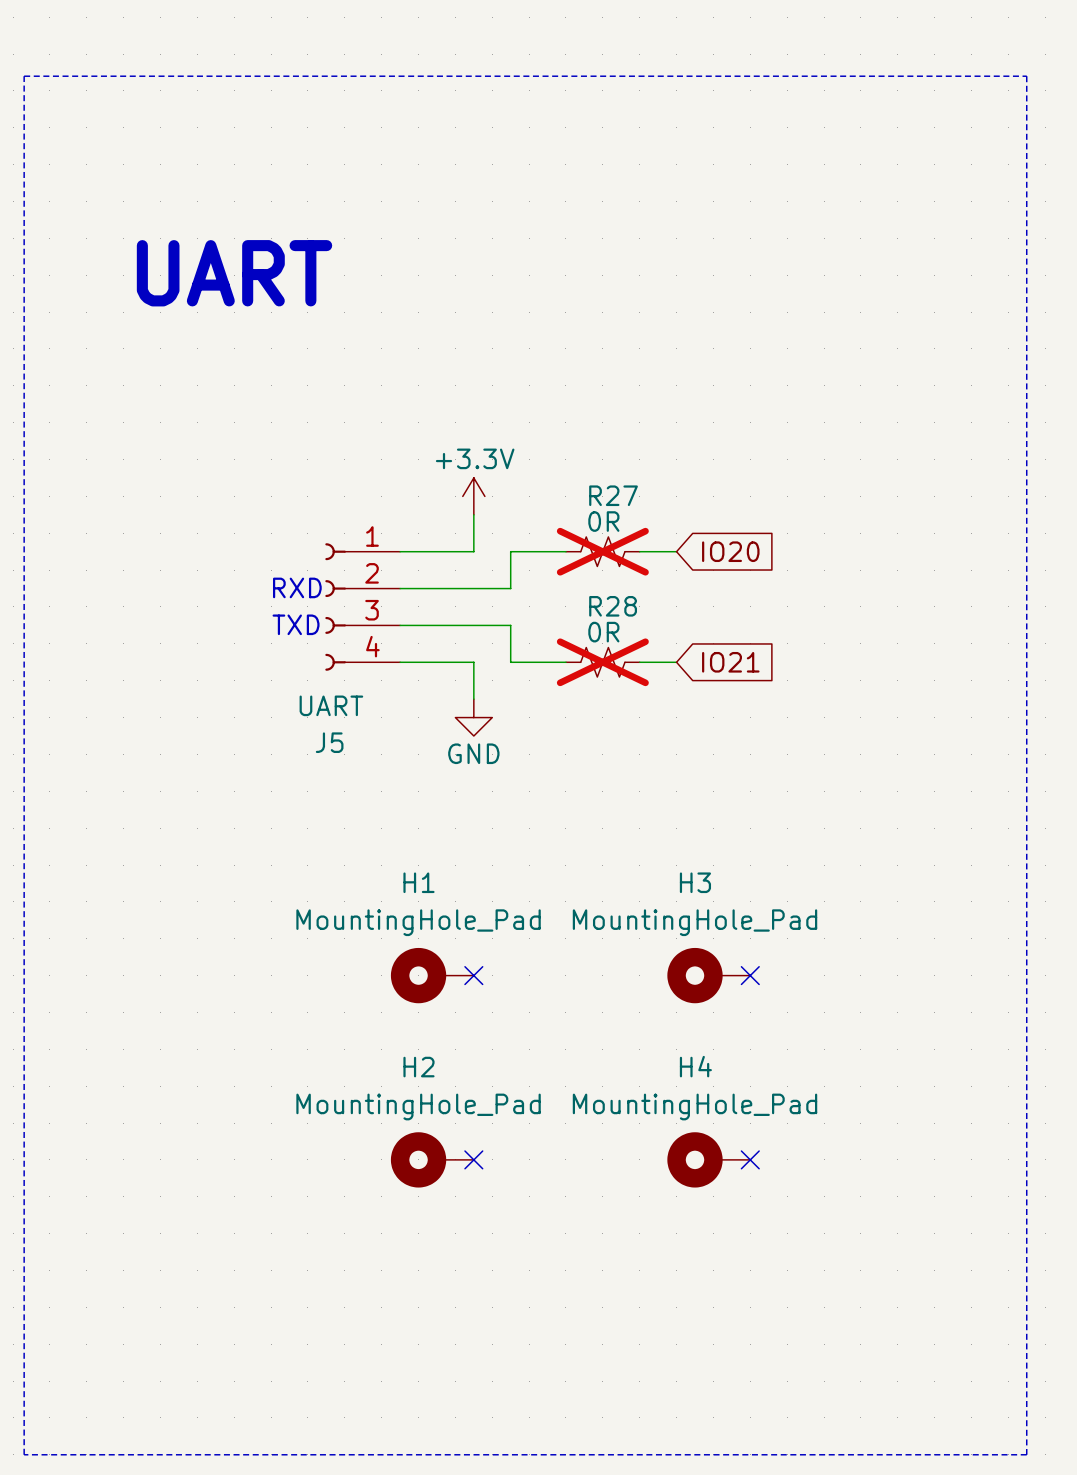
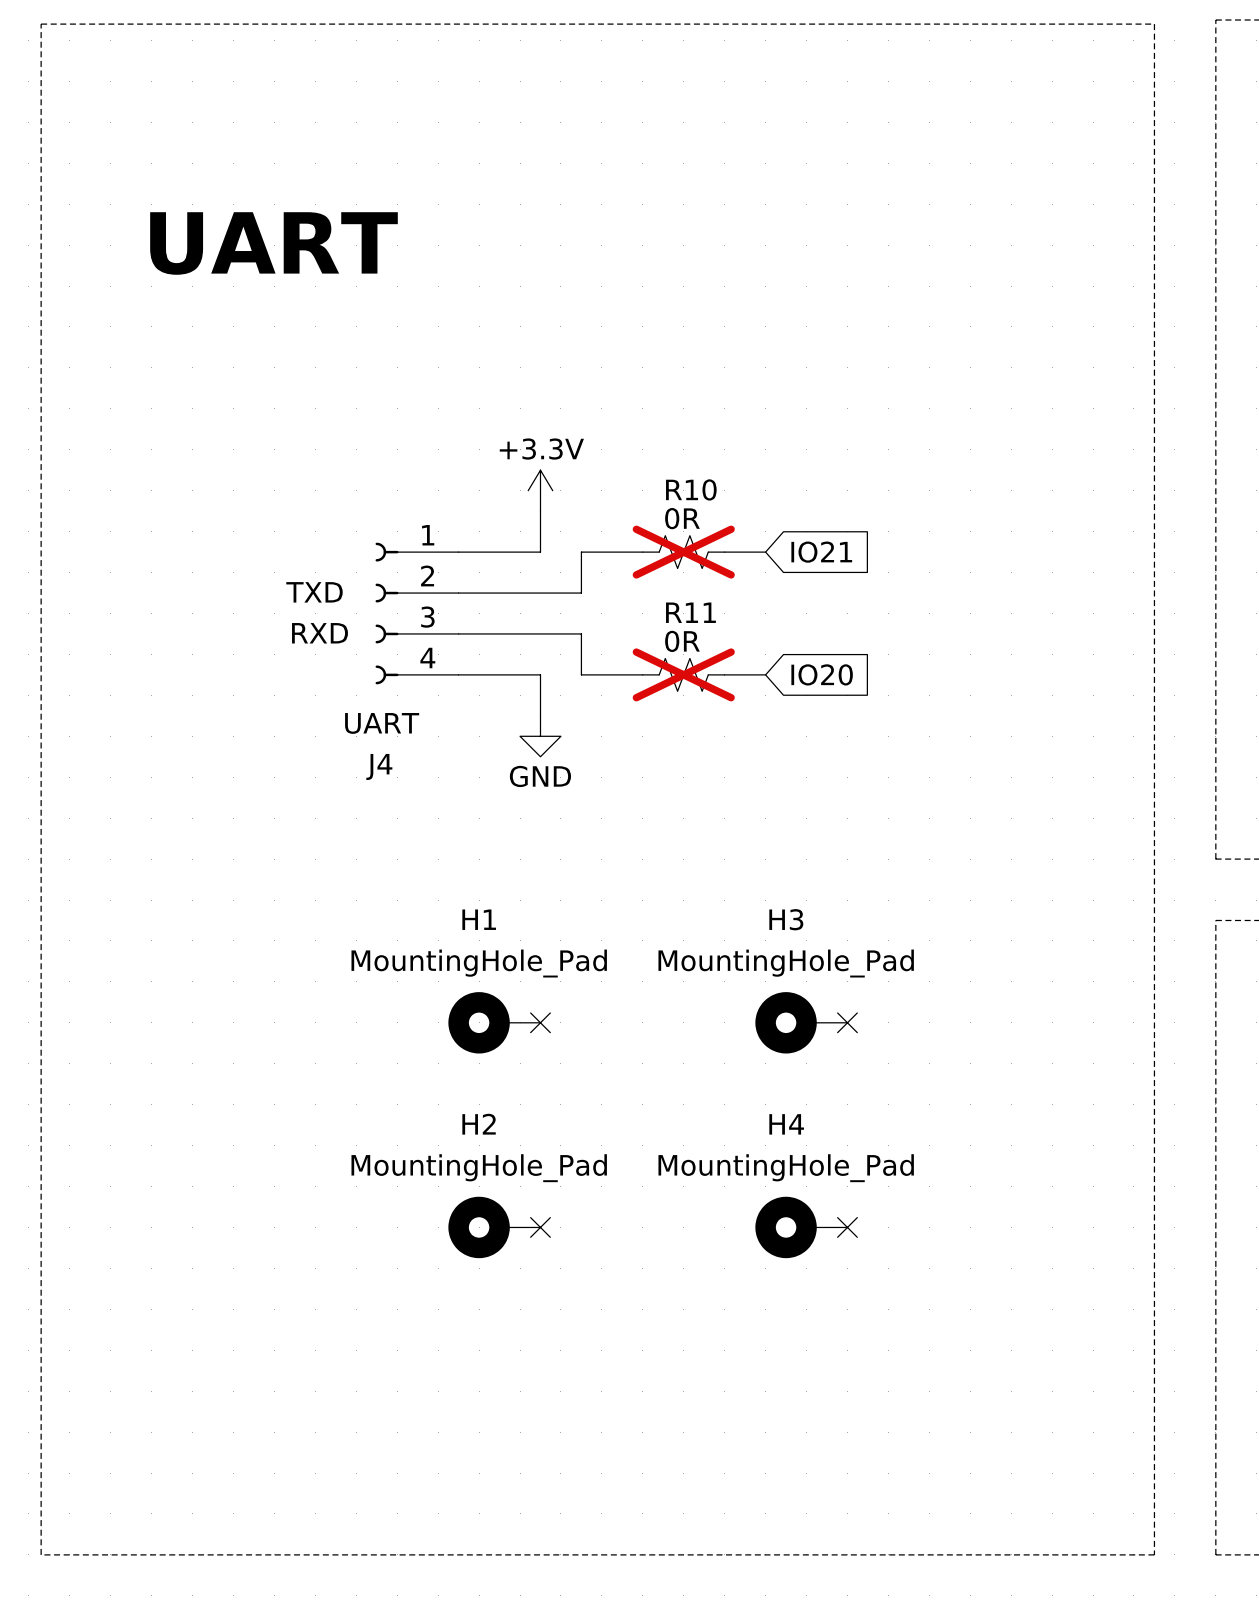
R27 name: R27 (613, 495) -> R10 (691, 489)
global label: IO20 (730, 551) -> IO21 (821, 552)
text position: RXD (297, 587) -> RXD (320, 633)
R28 name: R28 (613, 606) -> R11 (690, 612)
text position: TXD (296, 624) -> TXD (314, 592)
global label: IO21 (730, 662) -> IO20 (822, 674)
J5 name: J5 (329, 742) -> J4 (379, 766)

